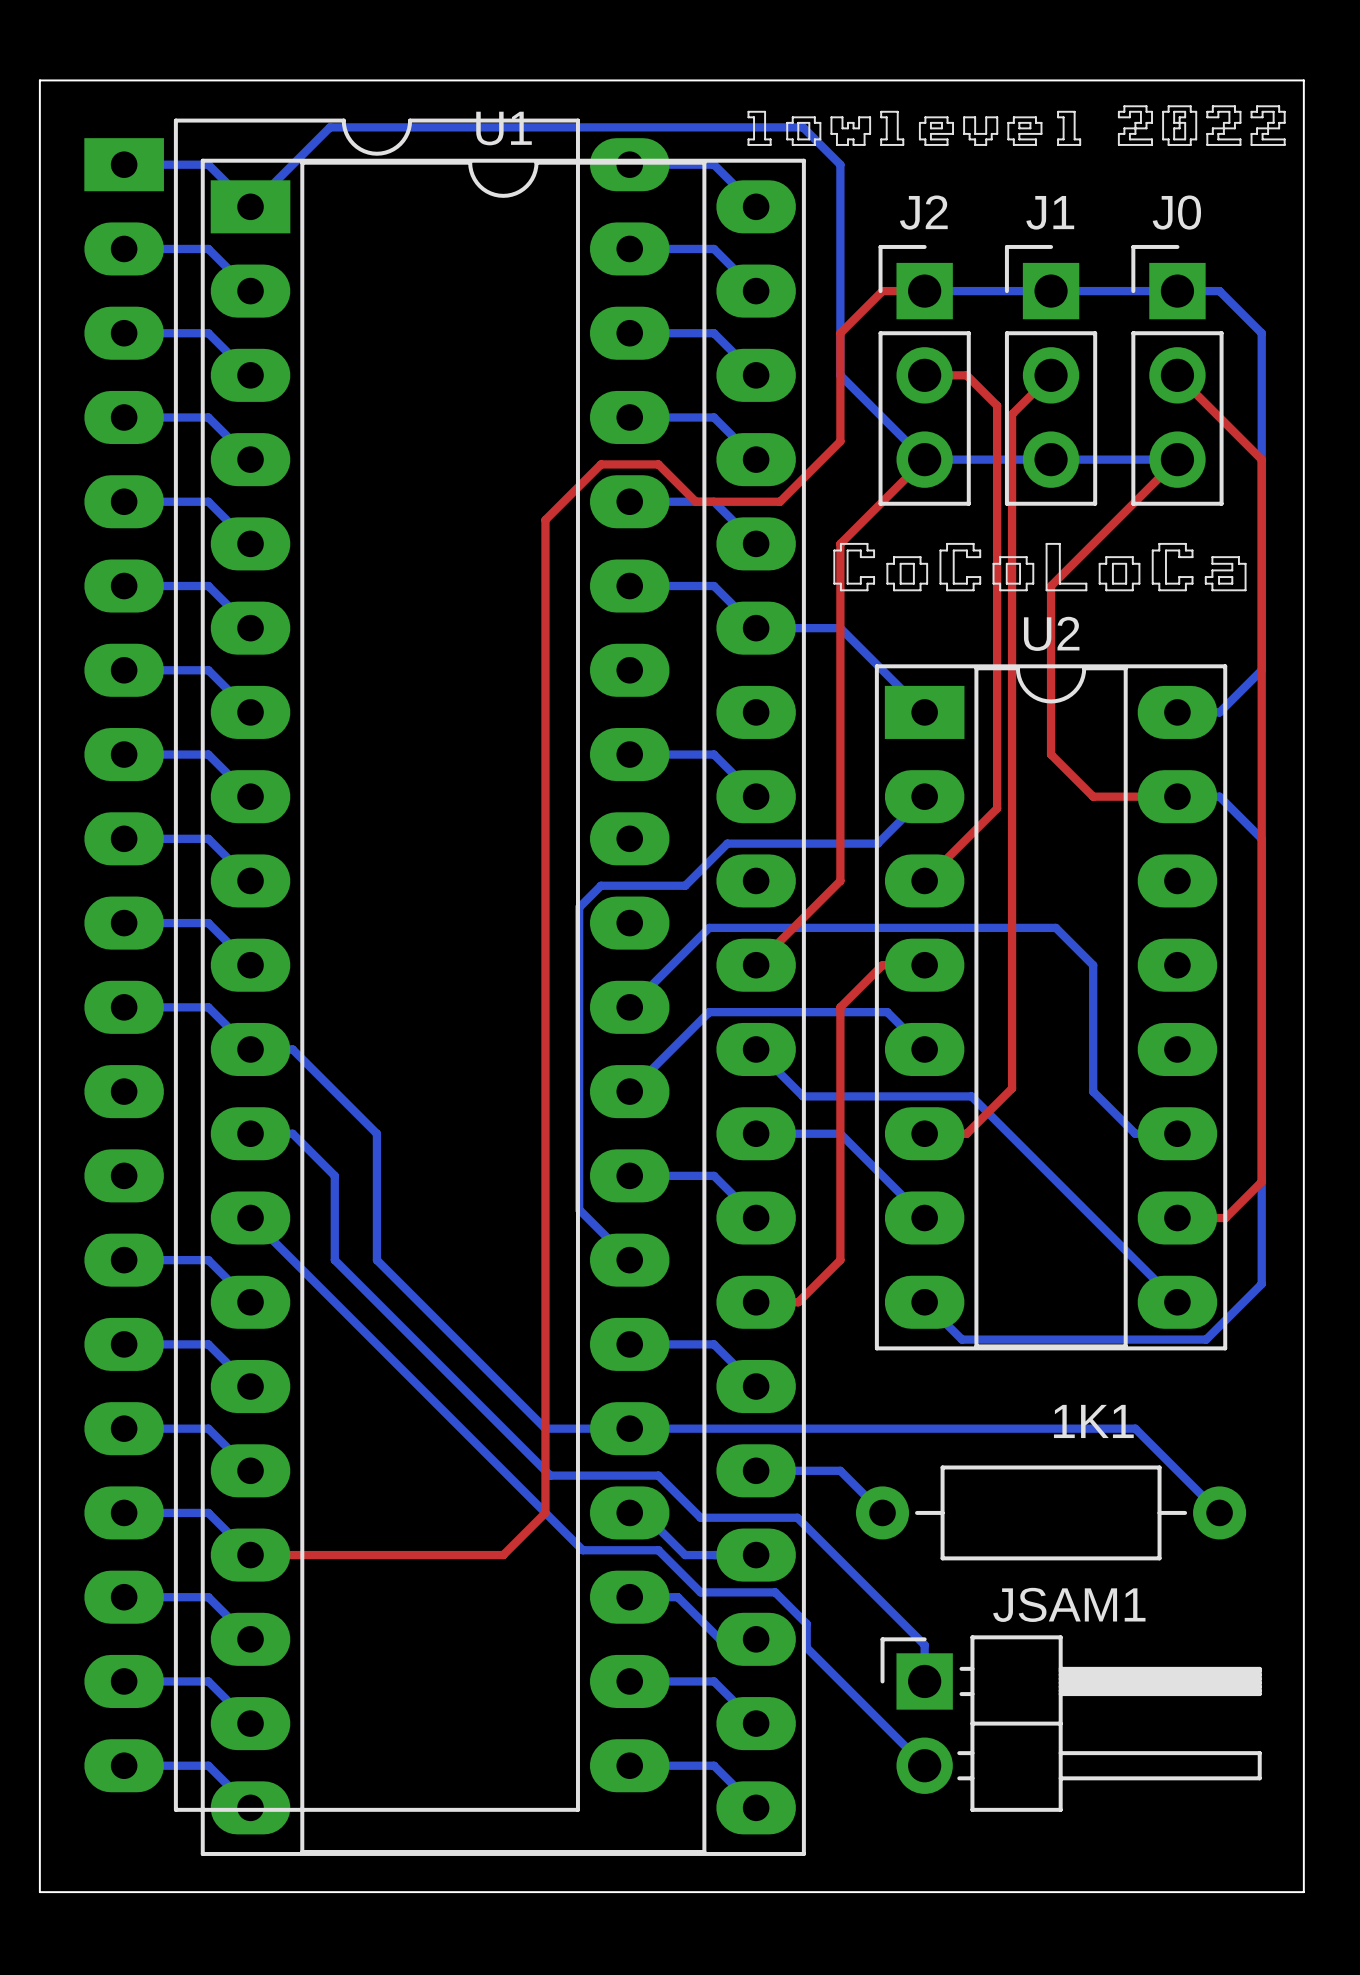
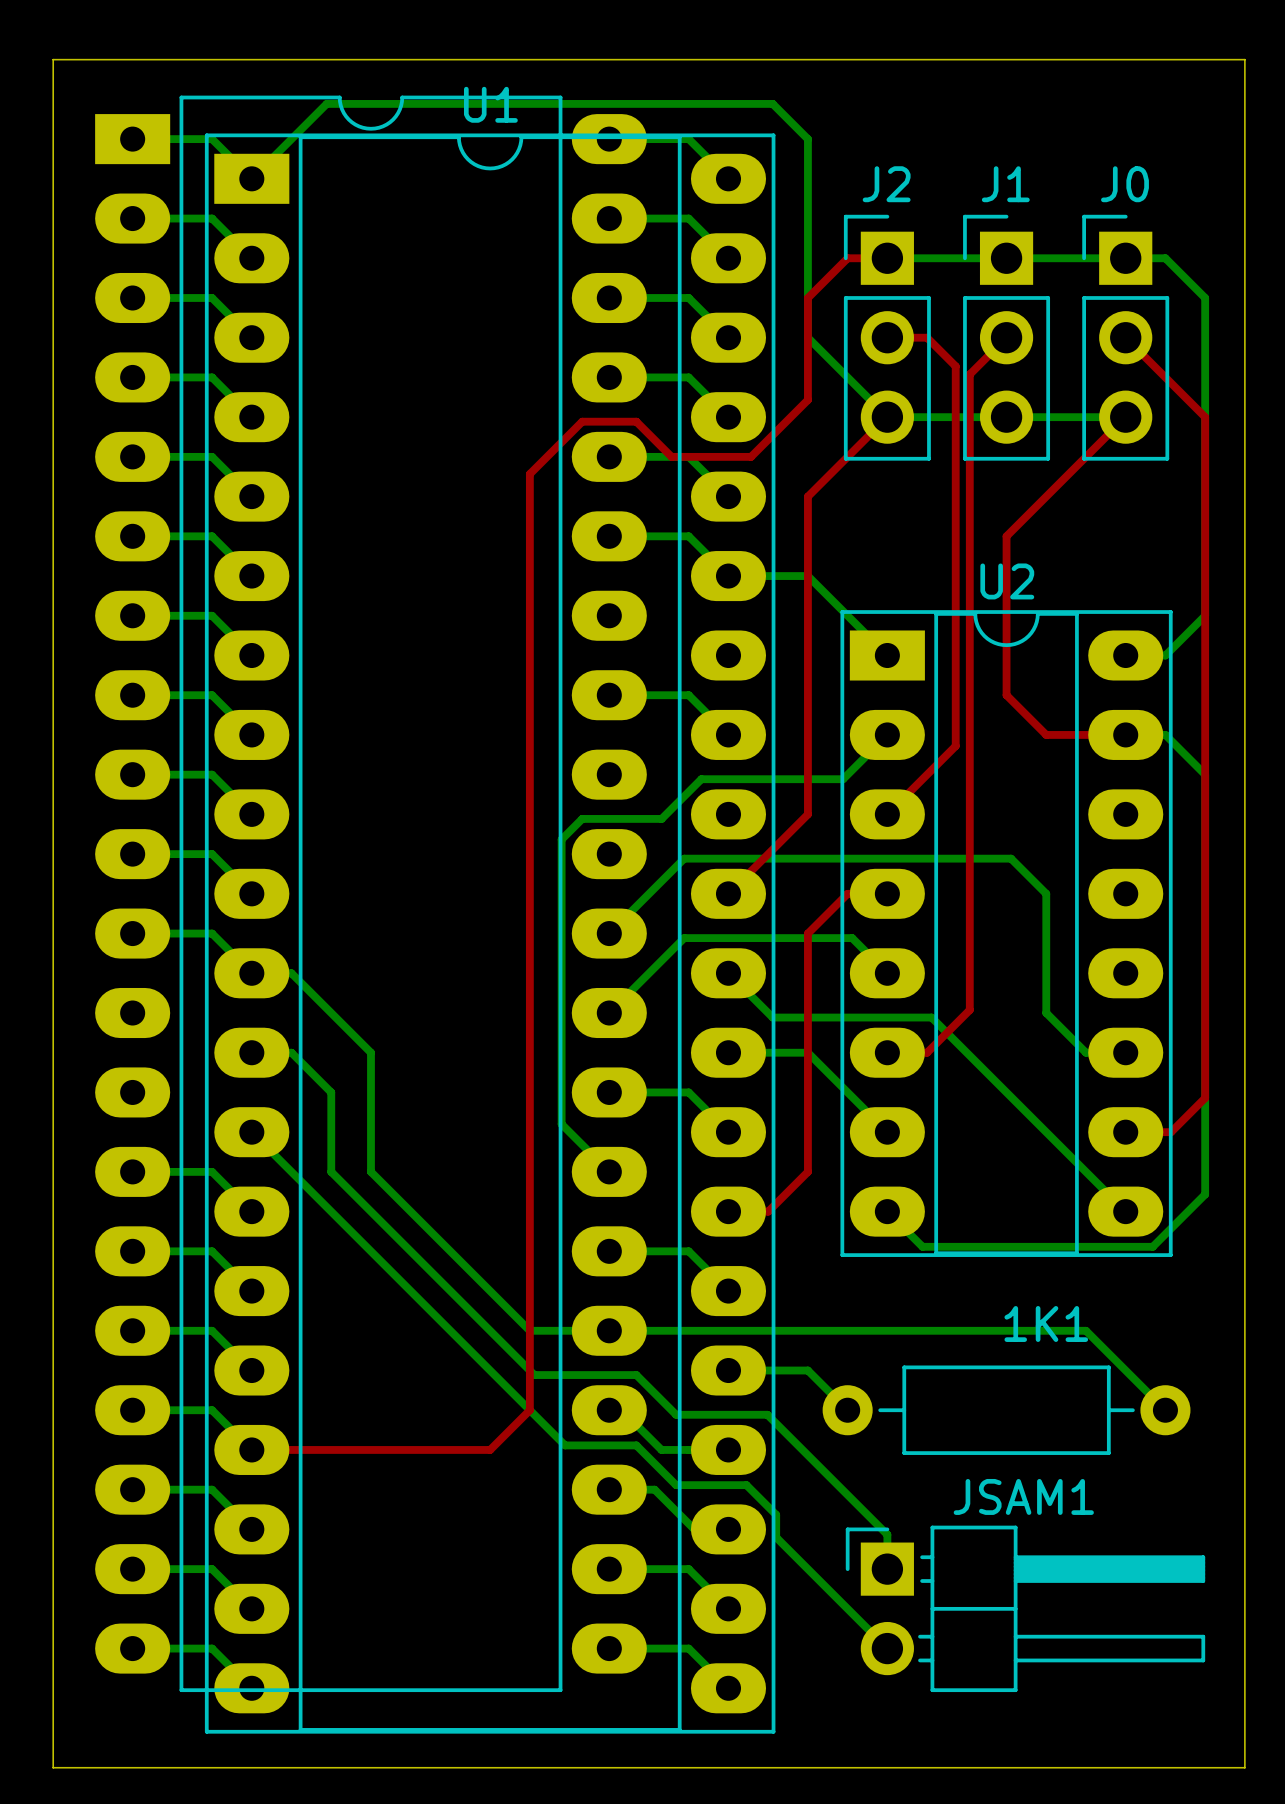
line: (1124, 106) (1146, 106) (1146, 111) (1152, 111) (1152, 122) (1146, 122) (1146, 128) (1124, 128) (1124, 133) (1118, 133) (1118, 144) (1152, 144) (1152, 139) (1129, 139) (1129, 133) (1135, 133) (1135, 122) (1140, 122) (1140, 111) (1129, 111) (1129, 117) (1118, 117) (1118, 111) (1124, 111) (1124, 106) -> none
line: (1168, 106) (1190, 106) (1190, 111) (1196, 111) (1196, 139) (1190, 139) (1190, 144) (1168, 144) (1168, 139) (1163, 139) (1163, 111) (1168, 111) (1168, 106) -> none
line: (1212, 106) (1234, 106) (1234, 111) (1240, 111) (1240, 122) (1234, 122) (1234, 128) (1212, 128) (1212, 133) (1207, 133) (1207, 144) (1240, 144) (1240, 139) (1218, 139) (1218, 133) (1223, 133) (1223, 122) (1229, 122) (1229, 111) (1218, 111) (1218, 117) (1207, 117) (1207, 111) (1212, 111) (1212, 106) -> none
line: (1257, 106) (1279, 106) (1279, 111) (1284, 111) (1284, 122) (1279, 122) (1279, 128) (1257, 128) (1257, 133) (1251, 133) (1251, 144) (1284, 144) (1284, 139) (1262, 139) (1262, 133) (1268, 133) (1268, 122) (1273, 122) (1273, 111) (1262, 111) (1262, 117) (1251, 117) (1251, 111) (1257, 111) (1257, 106) -> none
line: (748, 111) (765, 111) (765, 139) (770, 139) (770, 144) (748, 144) (748, 139) (754, 139) (754, 117) (748, 117) (748, 111) -> none
line: (881, 111) (897, 111) (897, 139) (903, 139) (903, 144) (881, 144) (881, 139) (886, 139) (886, 117) (881, 117) (881, 111) -> none
line: (1058, 111) (1074, 111) (1074, 139) (1080, 139) (1080, 144) (1058, 144) (1058, 139) (1063, 139) (1063, 117) (1058, 117) (1058, 111) -> none
line: (1174, 111) (1185, 111) (1185, 117) (1179, 117) (1179, 128) (1174, 128) (1174, 139) (1185, 139) (1185, 122) (1174, 122) (1174, 111) -> none
line: (792, 117) (792, 122) (787, 122) (787, 139) (792, 139) (792, 144) (814, 144) (814, 139) (820, 139) (820, 122) (814, 122) (814, 117) (792, 117) -> none
line: (831, 117) (842, 117) (842, 128) (847, 128) (847, 122) (853, 122) (853, 128) (859, 128) (859, 117) (870, 117) (870, 133) (864, 133) (864, 144) (853, 144) (853, 139) (847, 139) (847, 144) (836, 144) (836, 133) (831, 133) (831, 117) -> none
line: (925, 117) (947, 117) (947, 122) (953, 122) (953, 133) (930, 133) (930, 139) (947, 139) (947, 144) (925, 144) (925, 139) (919, 139) (919, 122) (925, 122) (925, 117) -> none
line: (964, 117) (975, 117) (975, 133) (986, 133) (986, 117) (997, 117) (997, 133) (991, 133) (991, 139) (986, 139) (986, 144) (975, 144) (975, 139) (969, 139) (969, 133) (964, 133) (964, 117) -> none
line: (1013, 117) (1035, 117) (1035, 122) (1041, 122) (1041, 133) (1019, 133) (1019, 139) (1035, 139) (1035, 144) (1013, 144) (1013, 139) (1008, 139) (1008, 122) (1013, 122) (1013, 117) -> none
line: (798, 122) (809, 122) (809, 139) (798, 139) (798, 122) -> none
line: (930, 122) (941, 122) (941, 128) (930, 128) (930, 122) -> none
line: (1019, 122) (1030, 122) (1030, 128) (1019, 128) (1019, 122) -> none
line: (840, 543) (867, 543) (867, 550) (874, 550) (874, 557) (860, 557) (860, 550) (847, 550) (847, 583) (860, 583) (860, 577) (874, 577) (874, 583) (867, 583) (867, 590) (840, 590) (840, 583) (834, 583) (834, 550) (840, 550) (840, 543) -> none
line: (947, 543) (973, 543) (973, 550) (980, 550) (980, 557) (966, 557) (966, 550) (953, 550) (953, 583) (966, 583) (966, 577) (980, 577) (980, 583) (973, 583) (973, 590) (947, 590) (947, 583) (940, 583) (940, 550) (947, 550) (947, 543) -> none
line: (1046, 543) (1059, 543) (1059, 583) (1086, 583) (1086, 590) (1046, 590) (1046, 543) -> none
line: (1159, 543) (1185, 543) (1185, 550) (1192, 550) (1192, 557) (1179, 557) (1179, 550) (1165, 550) (1165, 583) (1179, 583) (1179, 577) (1192, 577) (1192, 583) (1185, 583) (1185, 590) (1159, 590) (1159, 583) (1152, 583) (1152, 550) (1159, 550) (1159, 543) -> none
line: (893, 557) (920, 557) (920, 563) (927, 563) (927, 583) (920, 583) (920, 590) (893, 590) (893, 583) (887, 583) (887, 563) (893, 563) (893, 557) -> none
line: (1000, 557) (1026, 557) (1026, 563) (1033, 563) (1033, 583) (1026, 583) (1026, 590) (1000, 590) (1000, 583) (993, 583) (993, 563) (1000, 563) (1000, 557) -> none
line: (1106, 557) (1132, 557) (1132, 563) (1139, 563) (1139, 583) (1132, 583) (1132, 590) (1106, 590) (1106, 583) (1099, 583) (1099, 563) (1106, 563) (1106, 557) -> none
line: (1212, 557) (1238, 557) (1238, 563) (1245, 563) (1245, 590) (1212, 590) (1212, 583) (1205, 583) (1205, 577) (1212, 577) (1212, 570) (1232, 570) (1232, 563) (1212, 563) (1212, 557) -> none
line: (900, 563) (913, 563) (913, 583) (900, 583) (900, 563) -> none
line: (1006, 563) (1020, 563) (1020, 583) (1006, 583) (1006, 563) -> none
line: (1112, 563) (1126, 563) (1126, 583) (1112, 583) (1112, 563) -> none
line: (1219, 577) (1232, 577) (1232, 583) (1219, 583) (1219, 577) -> none

